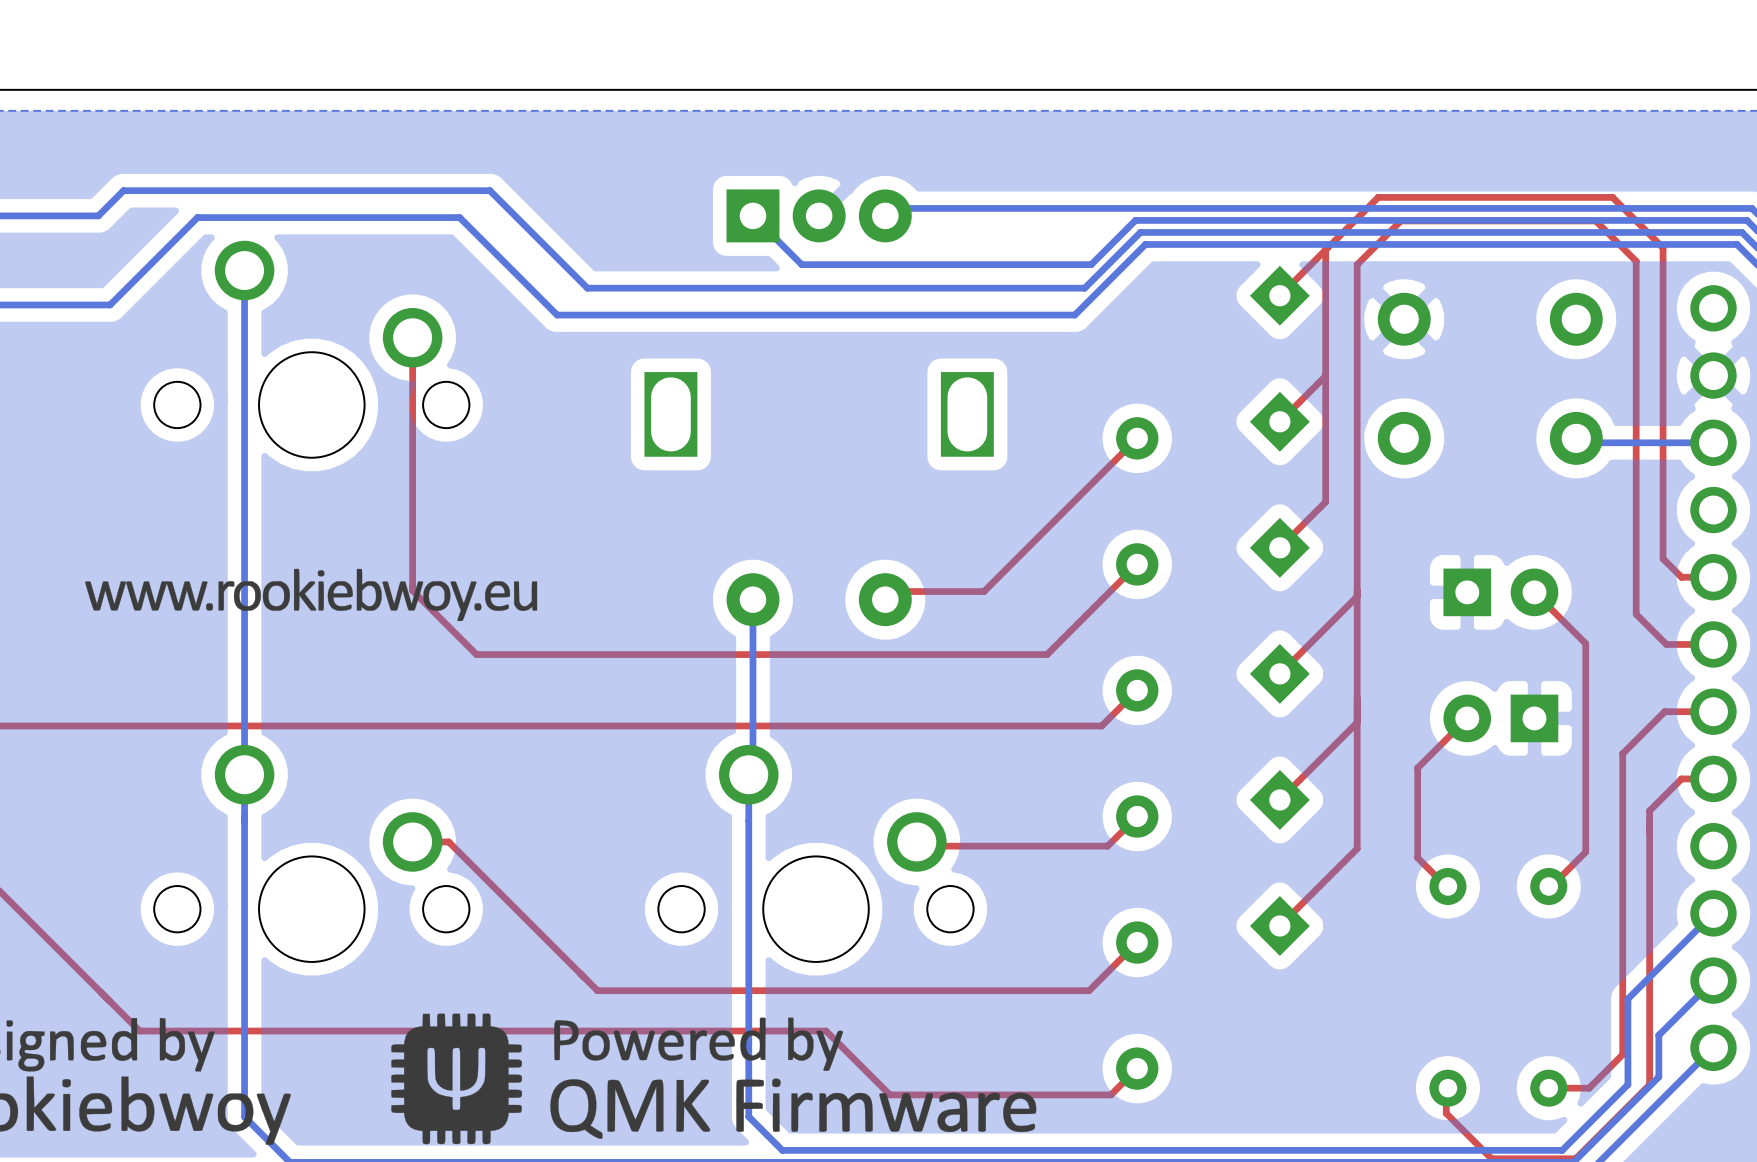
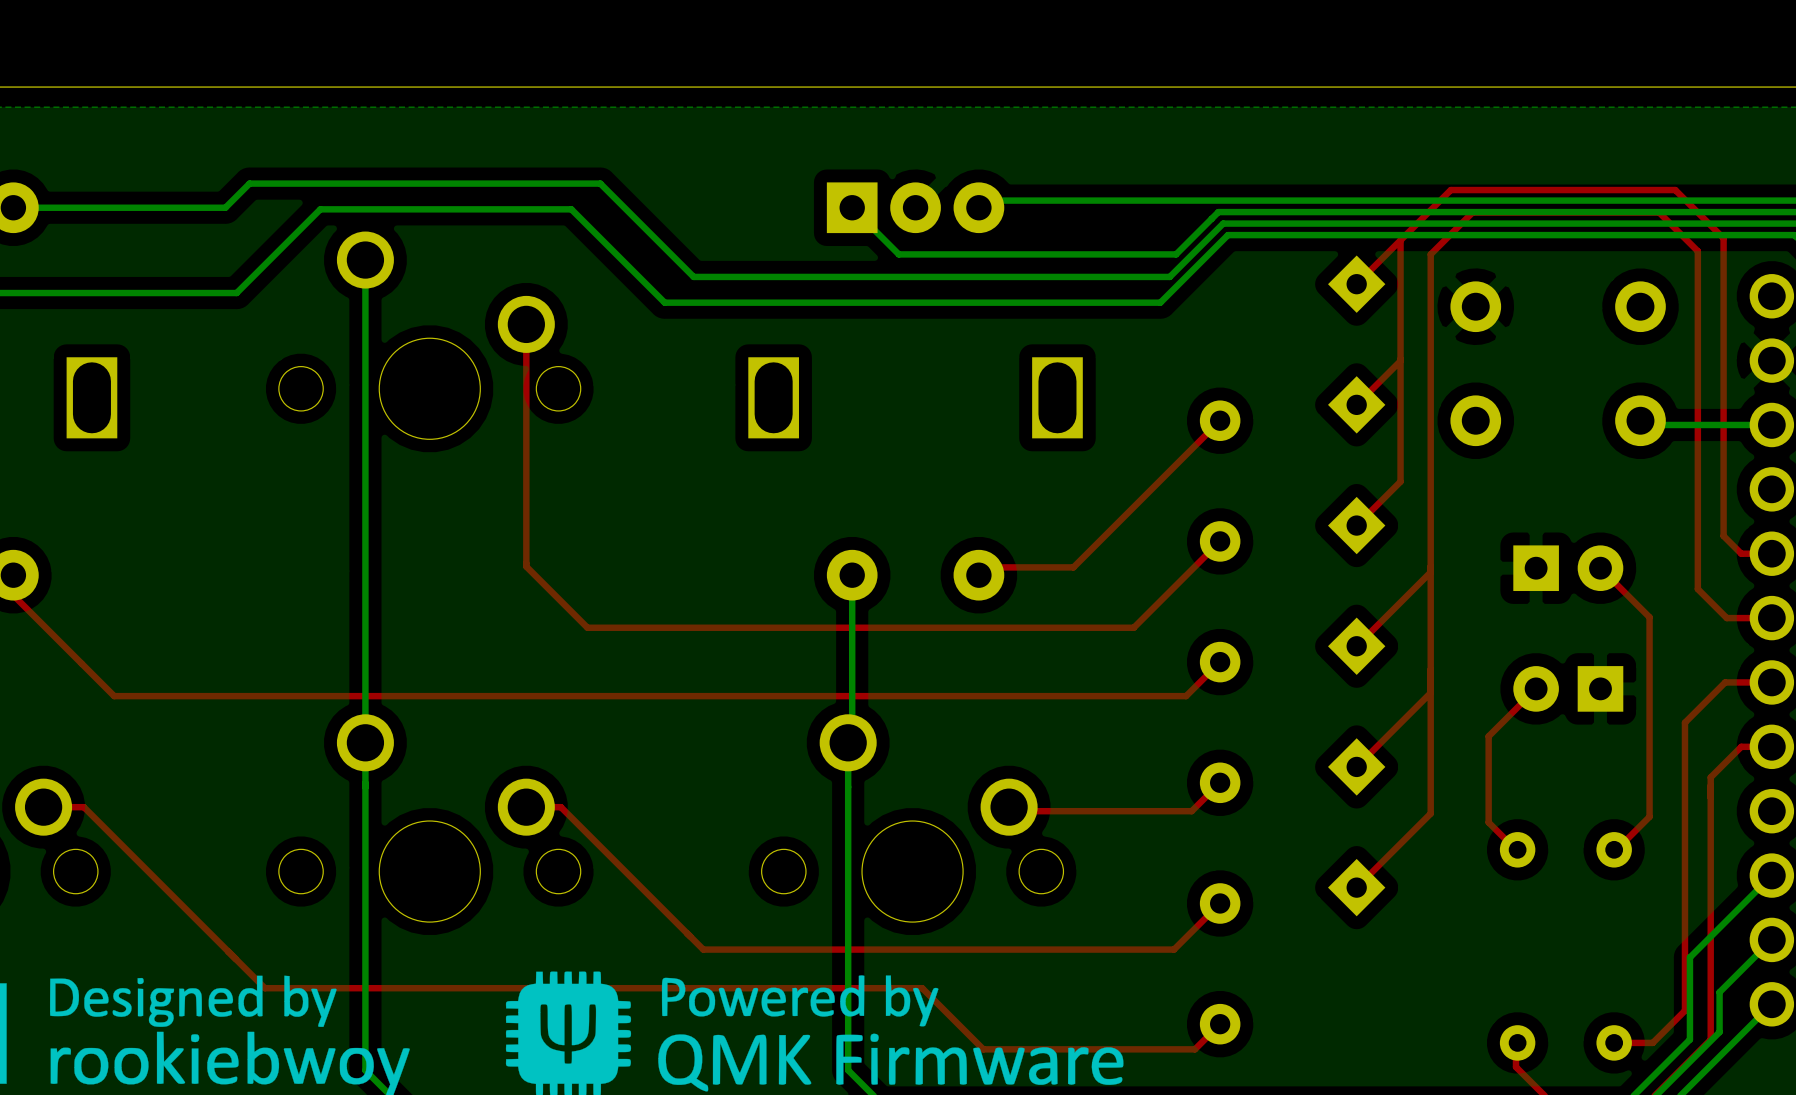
drawing: [85, 568, 538, 622] -> none

